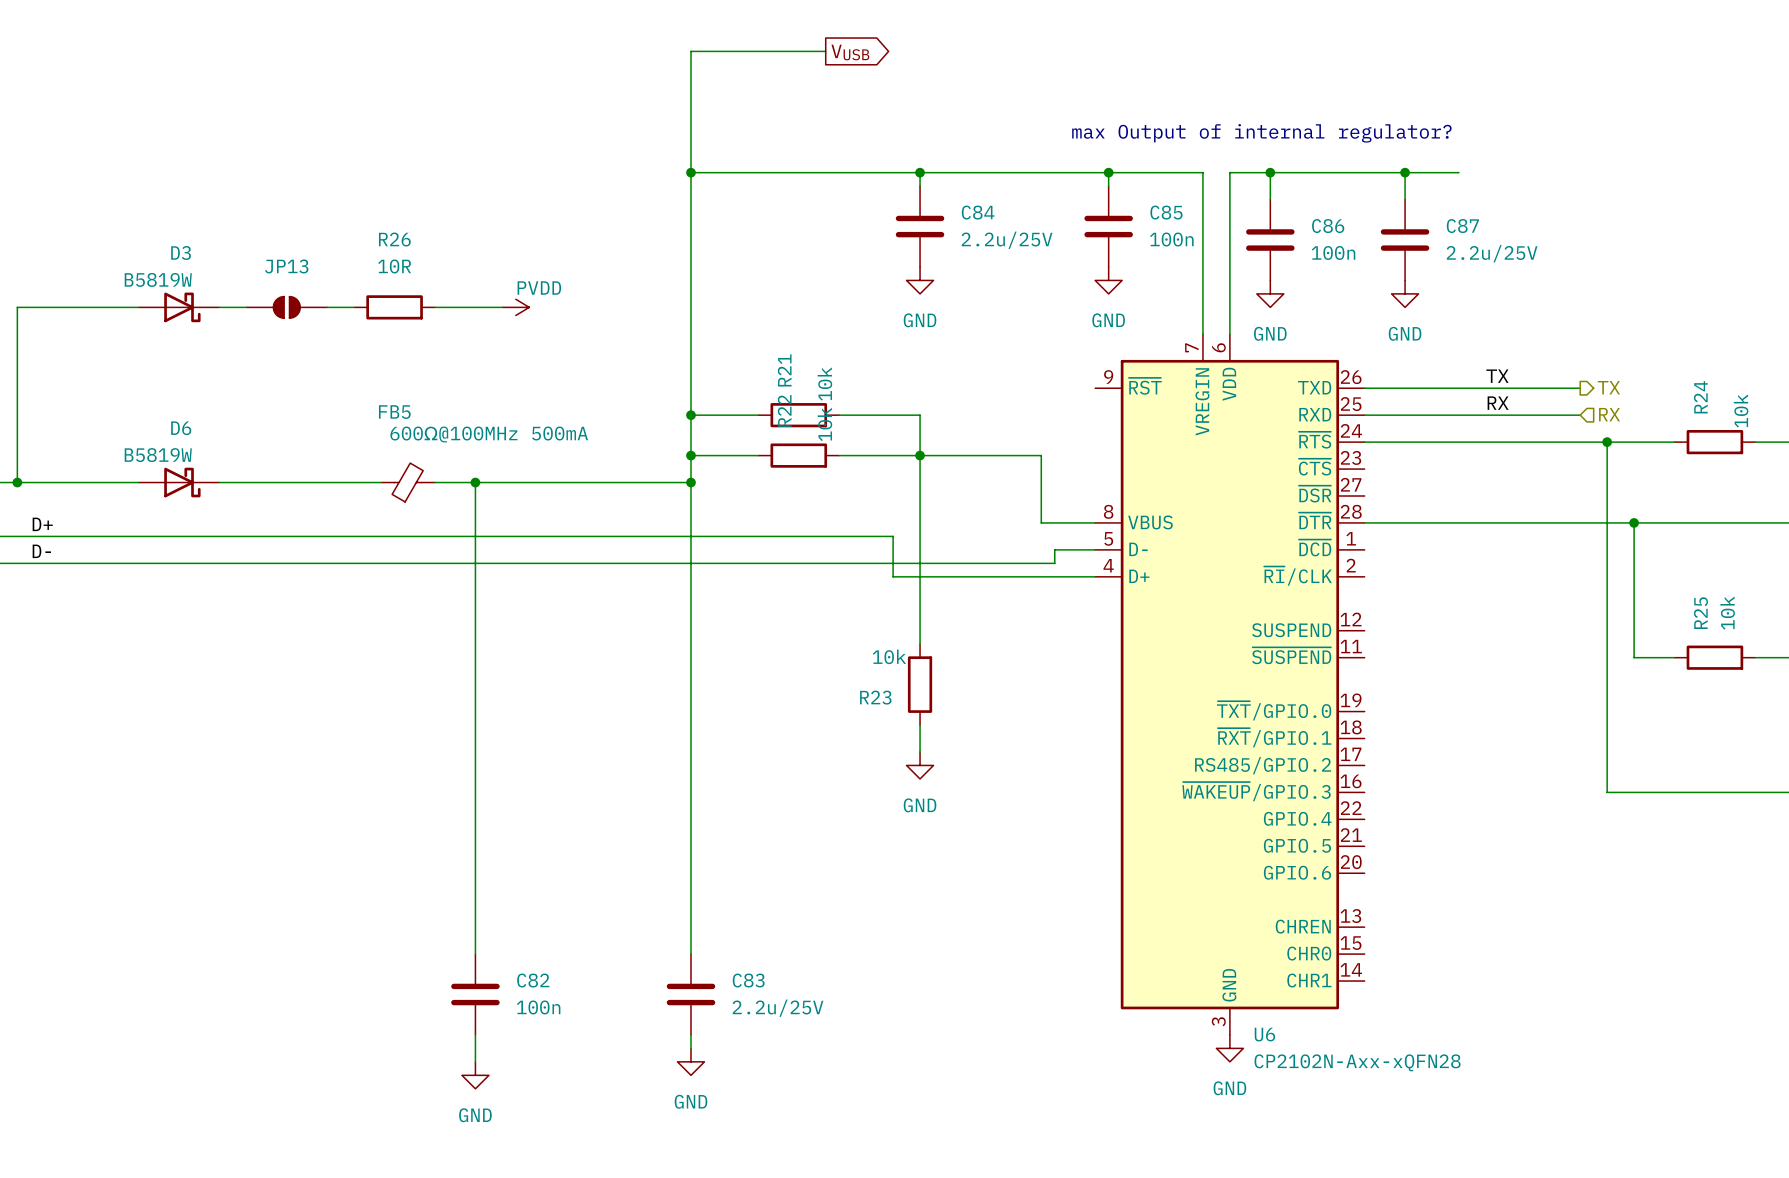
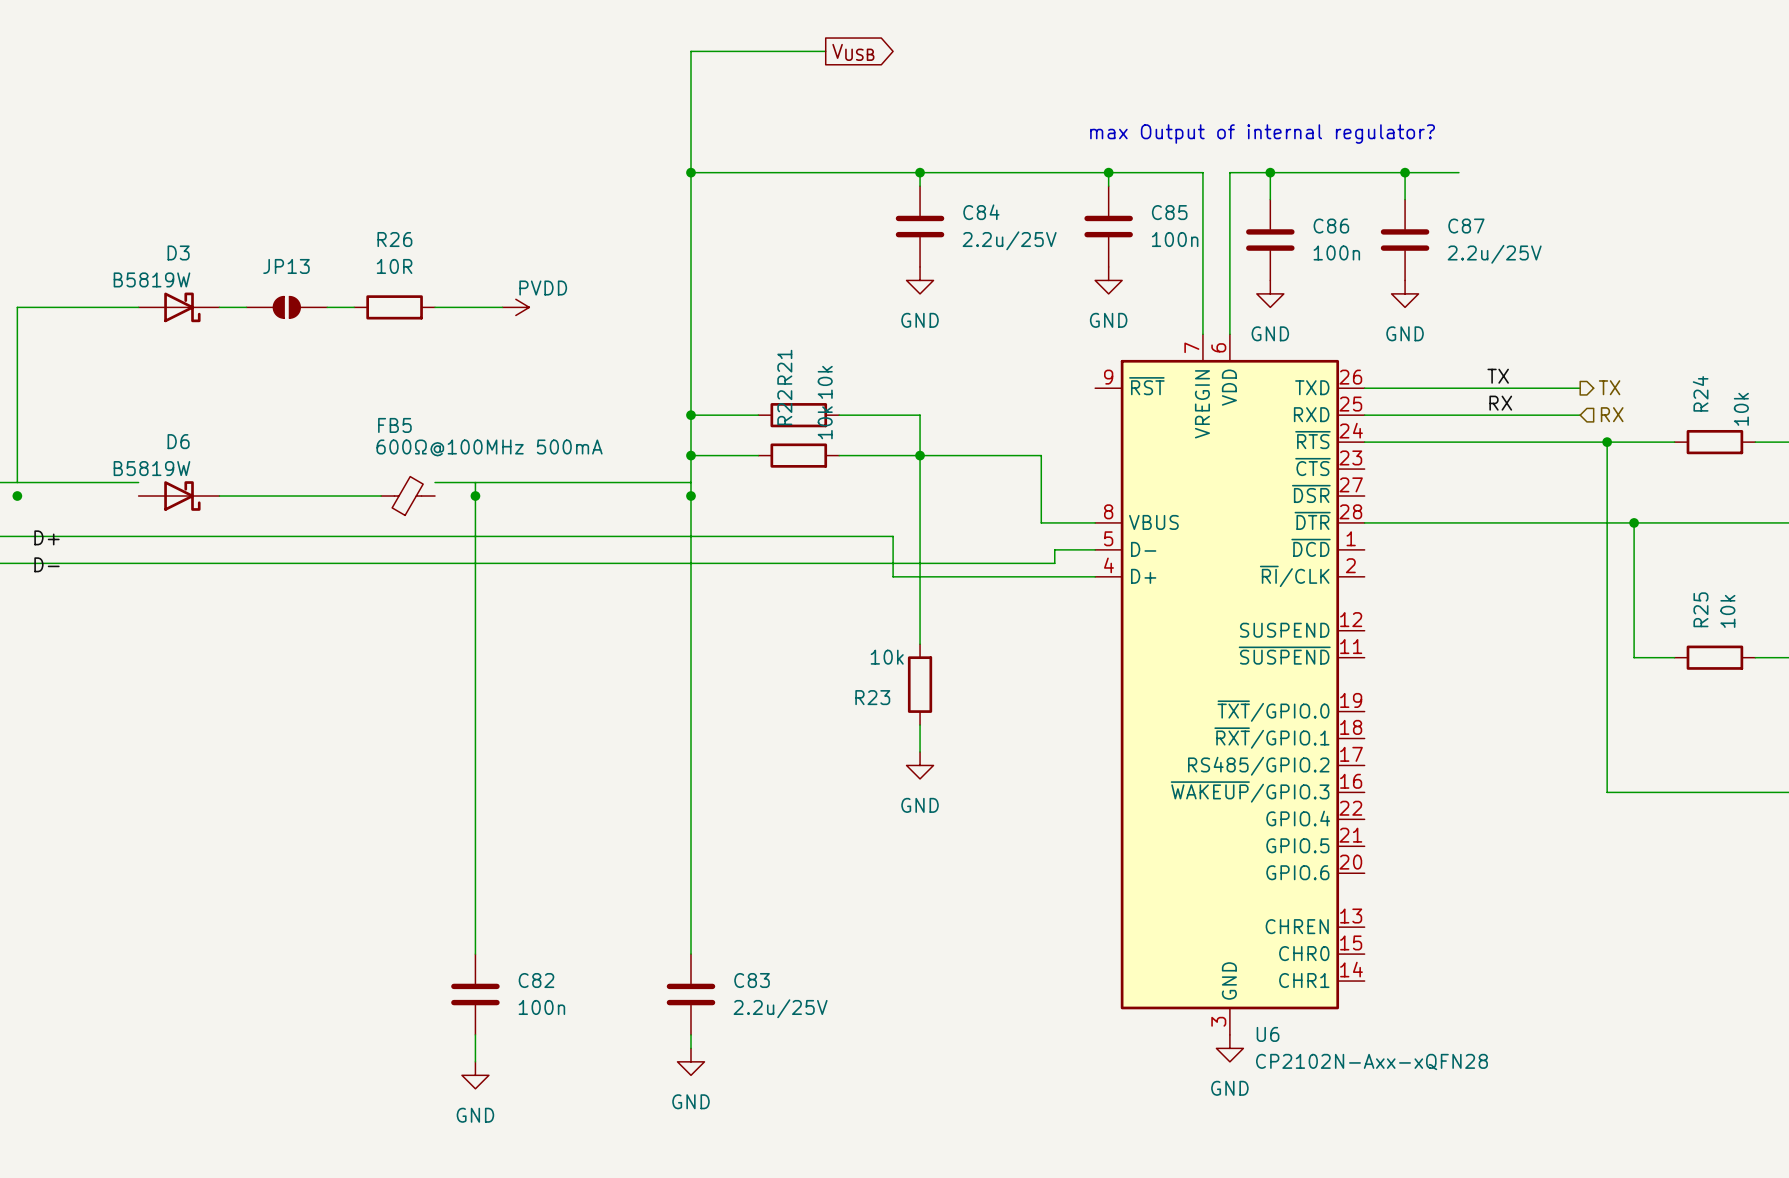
junction position: (17, 482) -> (17, 496)
D6 position: (179, 482) -> (179, 496)
wire: (219, 482) (381, 482) -> (219, 496) (381, 496)
FB5 position: (408, 482) -> (408, 496)
junction position: (475, 482) -> (475, 496)
junction position: (690, 482) -> (690, 496)
label position: D+ (42, 524) -> D+ (46, 537)
label position: D- (41, 551) -> D- (46, 564)

